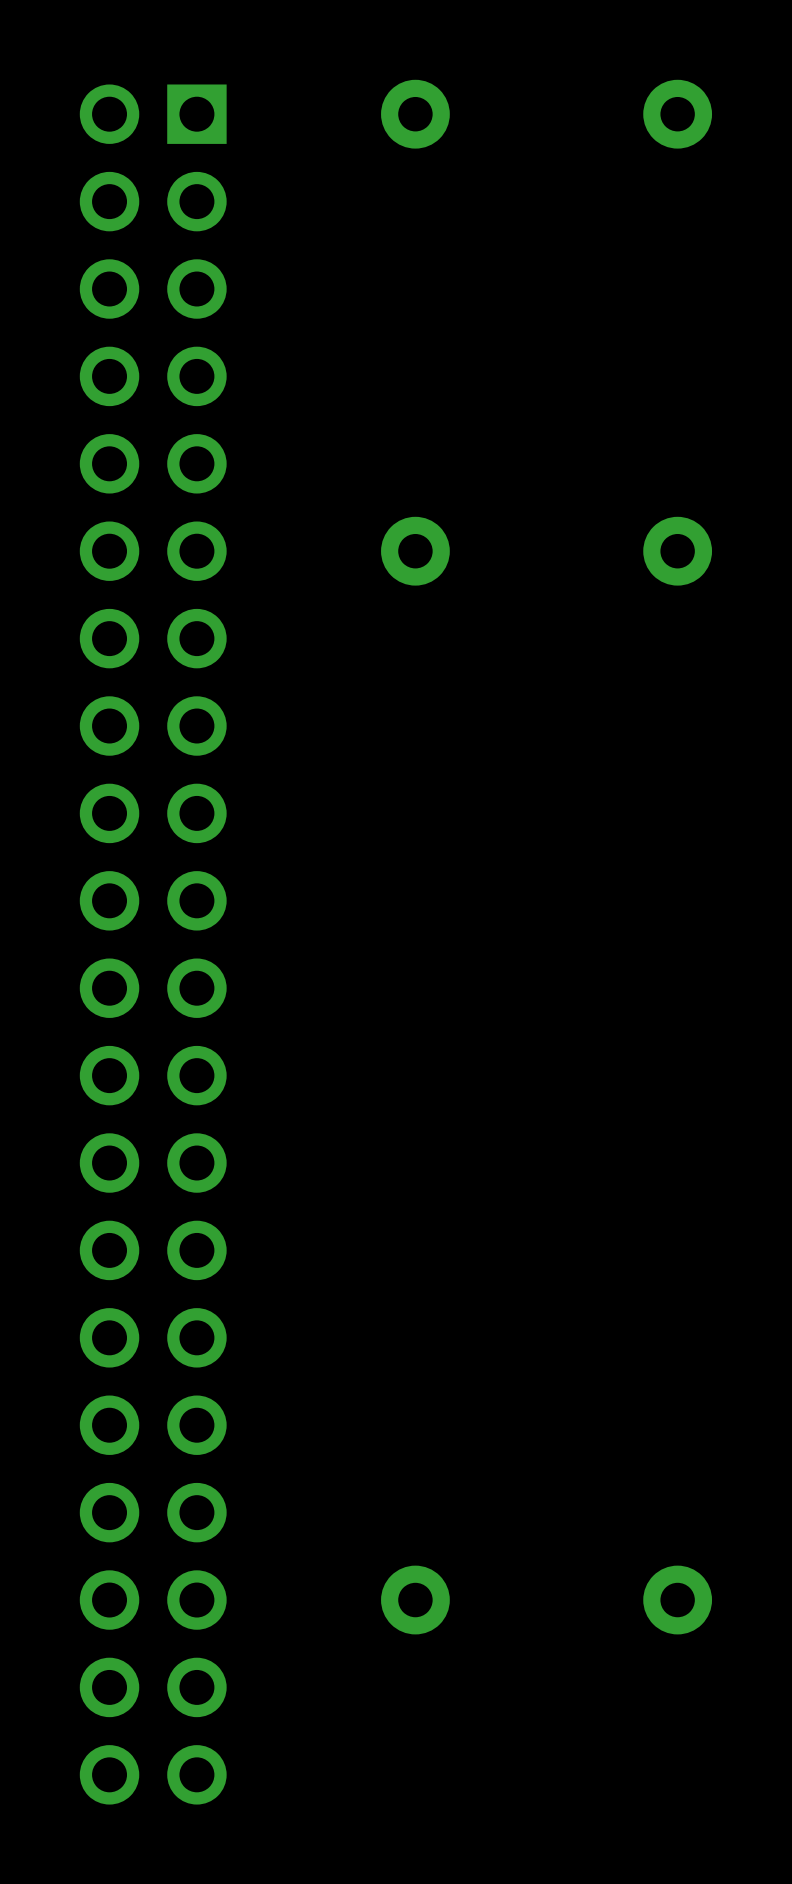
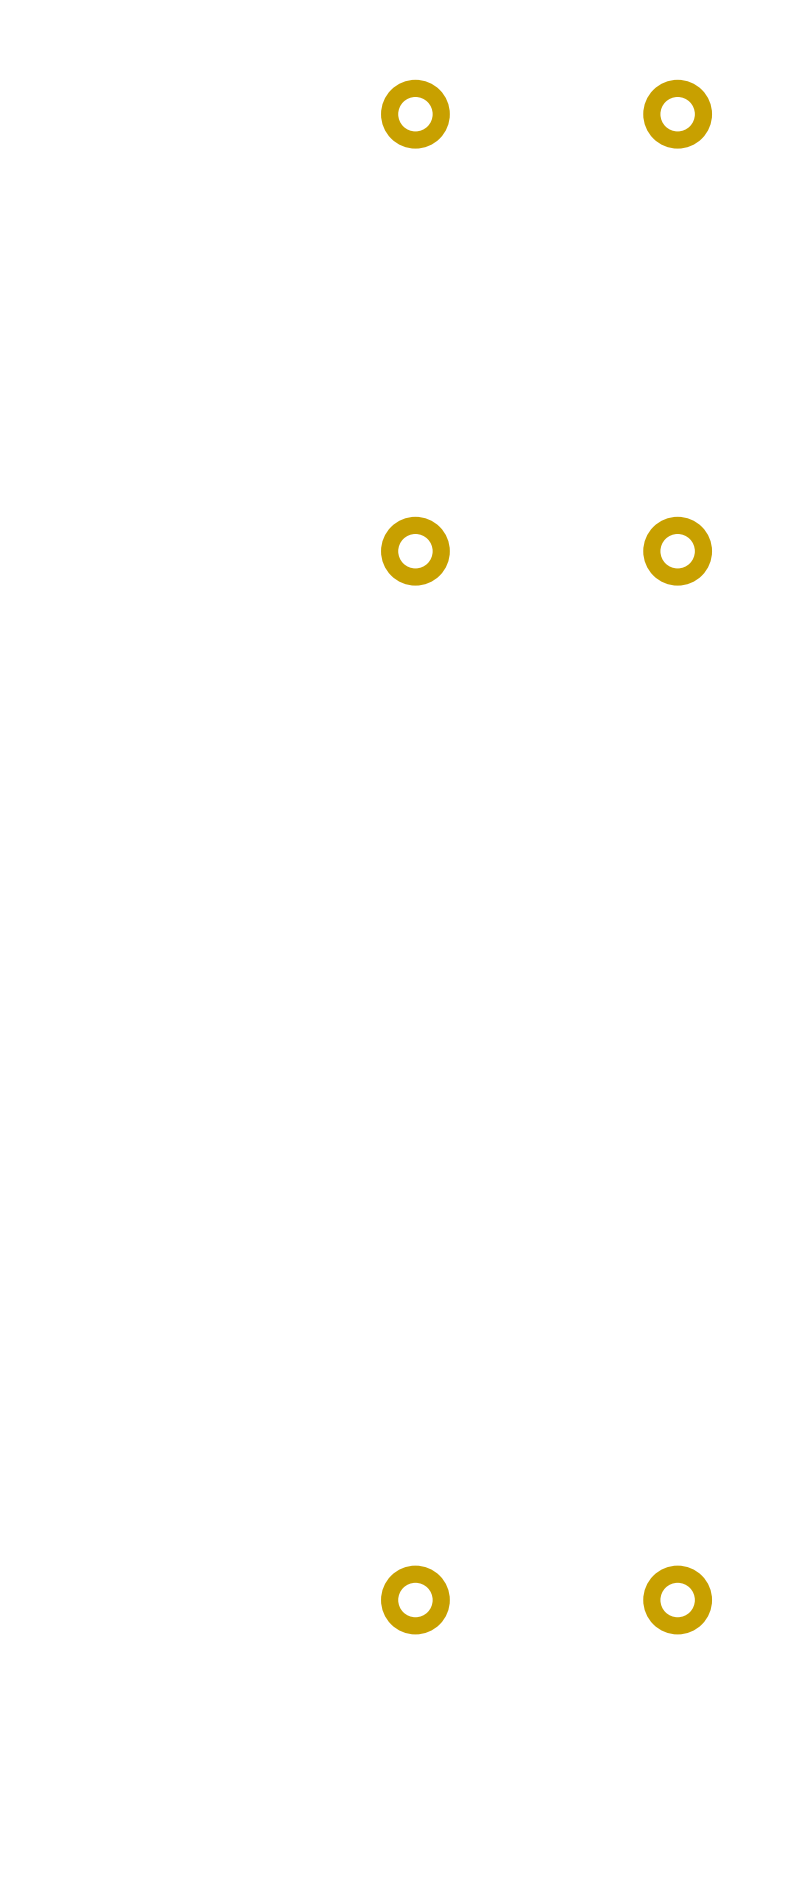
part: (153, 944) -> none

